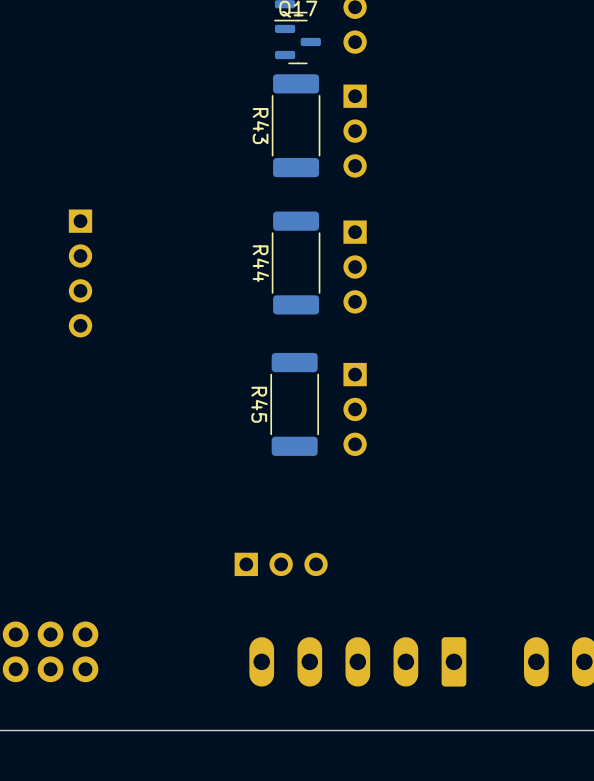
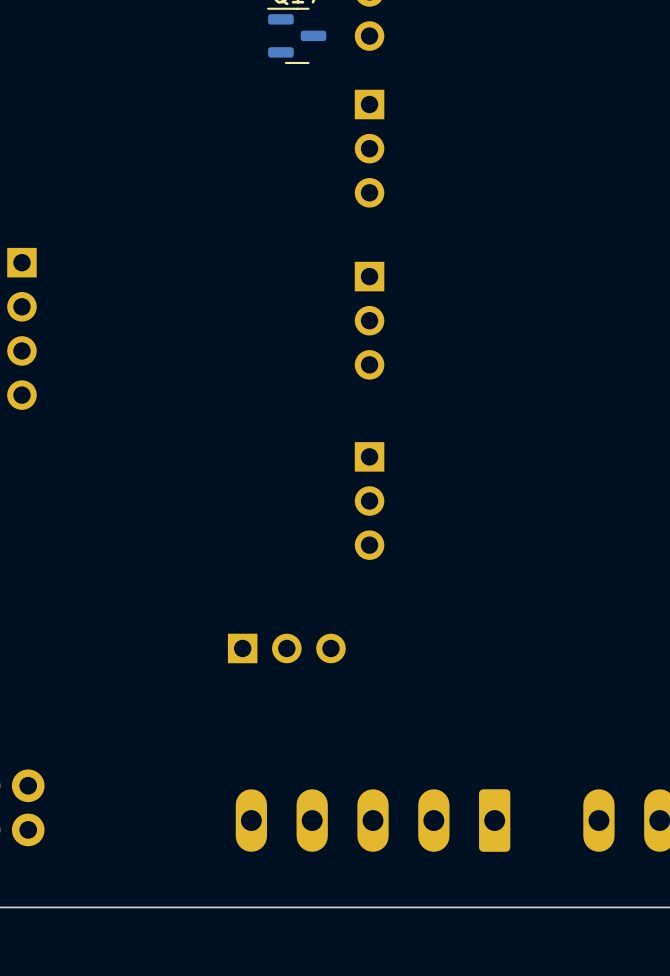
R43: (296, 125) -> none
R44: (296, 263) -> none
R45: (294, 404) -> none
part position: (281, 564) -> (286, 648)

